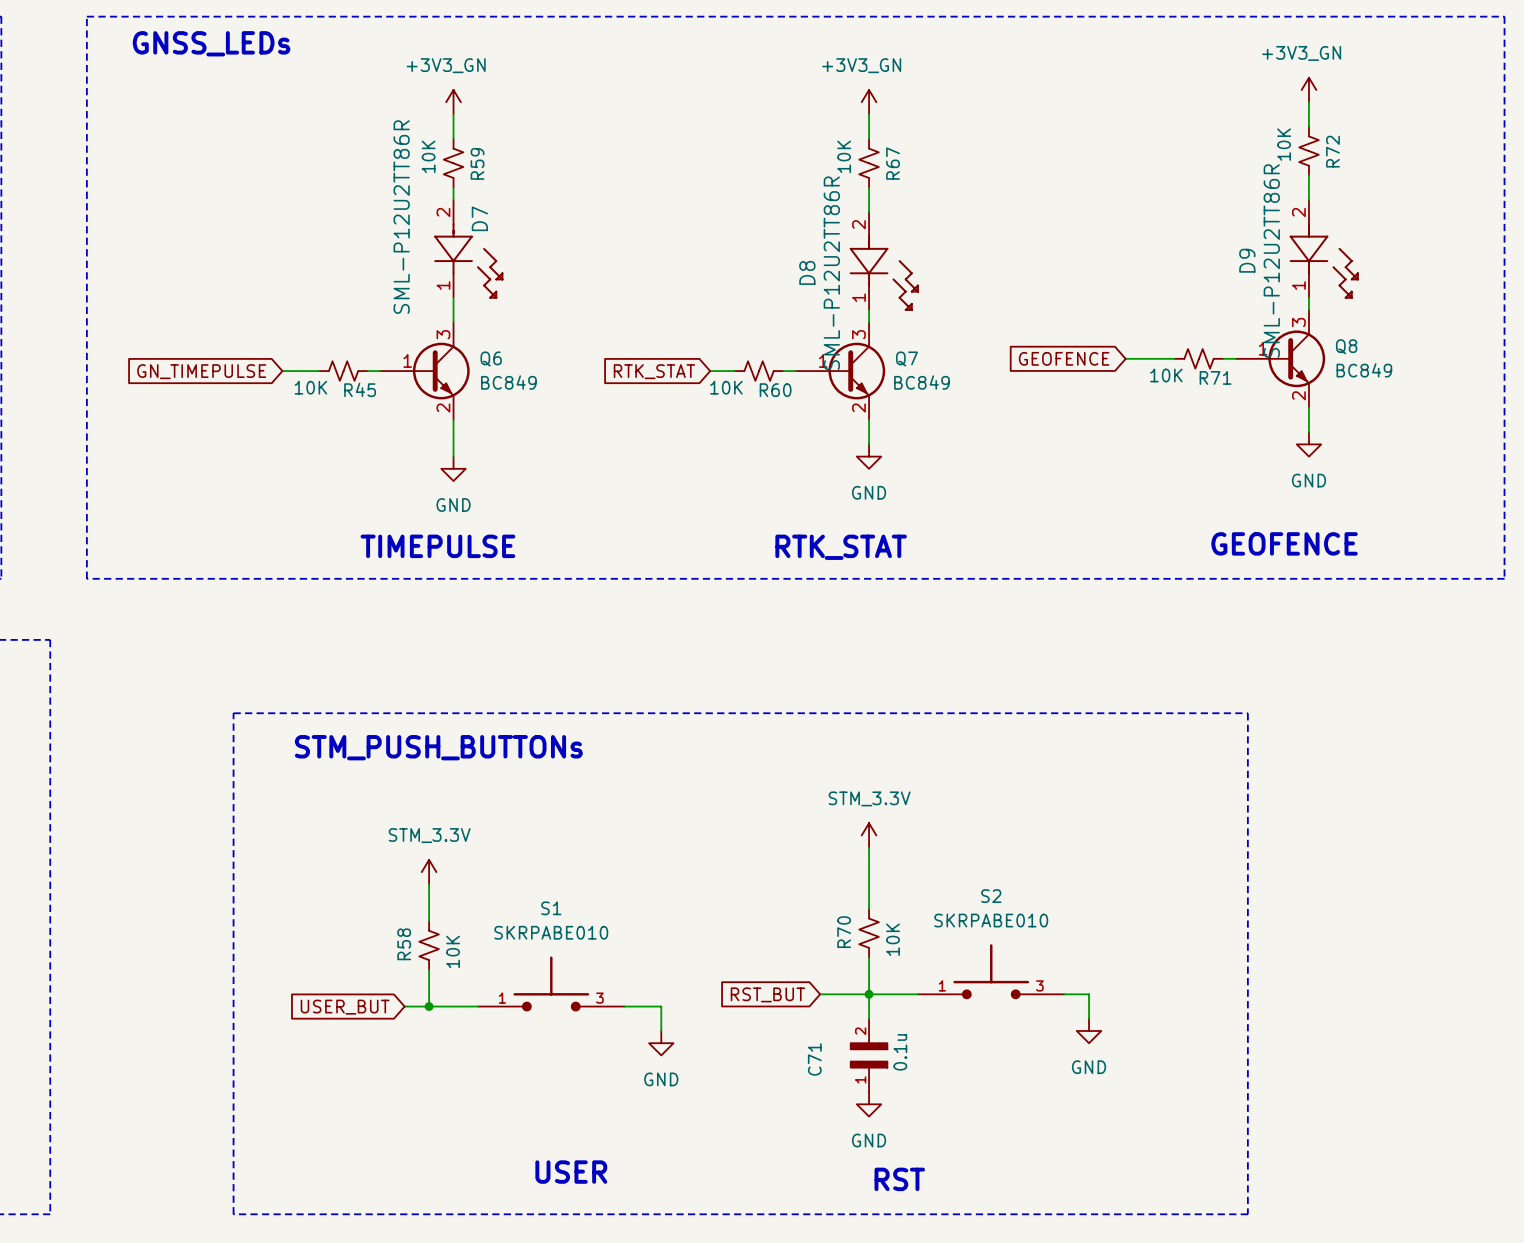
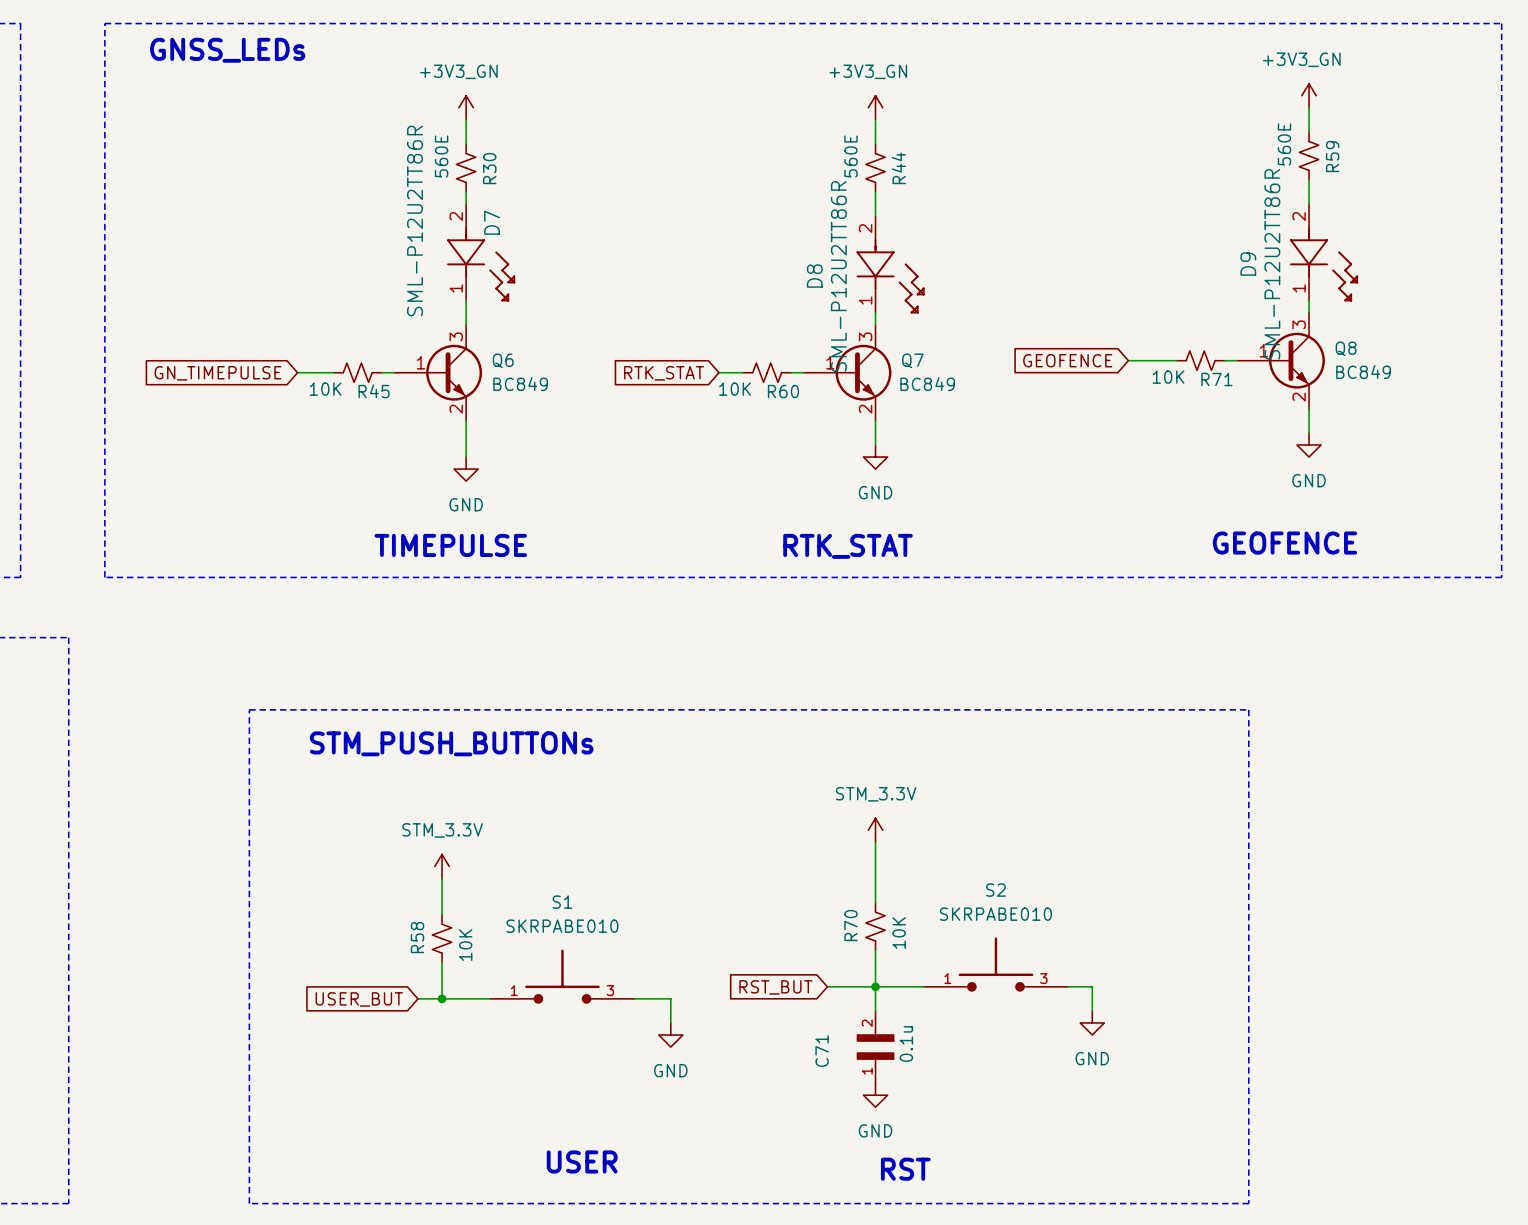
R72 value: 10K (1284, 144) -> 560E (1284, 144)
R72 name: R72 (1332, 151) -> R59 (1332, 156)
R59 value: 10K (428, 156) -> 560E (441, 156)
R67 value: 10K (844, 156) -> 560E (850, 156)
R59 name: R59 (477, 163) -> R30 (489, 168)
R67 name: R67 (893, 163) -> R44 (898, 168)

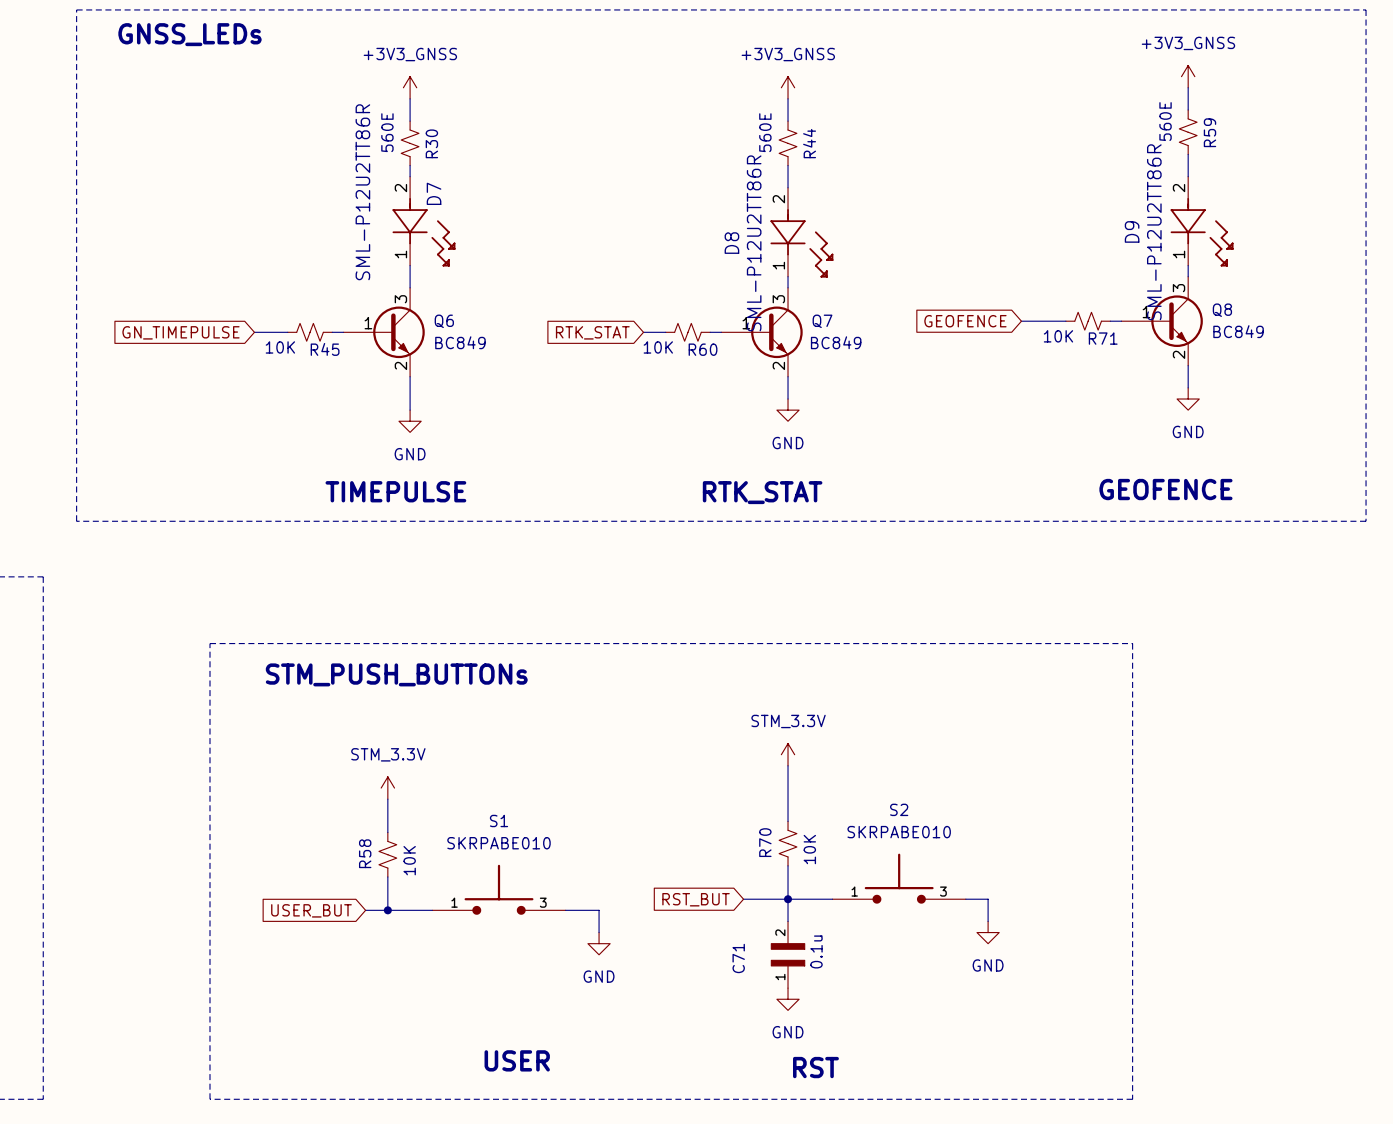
power symbol: +3V3_GN (1309, 95) -> +3V3_GNSS (1188, 76)
power symbol: +3V3_GN (466, 107) -> +3V3_GNSS (410, 87)
power symbol: +3V3_GN (875, 107) -> +3V3_GNSS (788, 87)

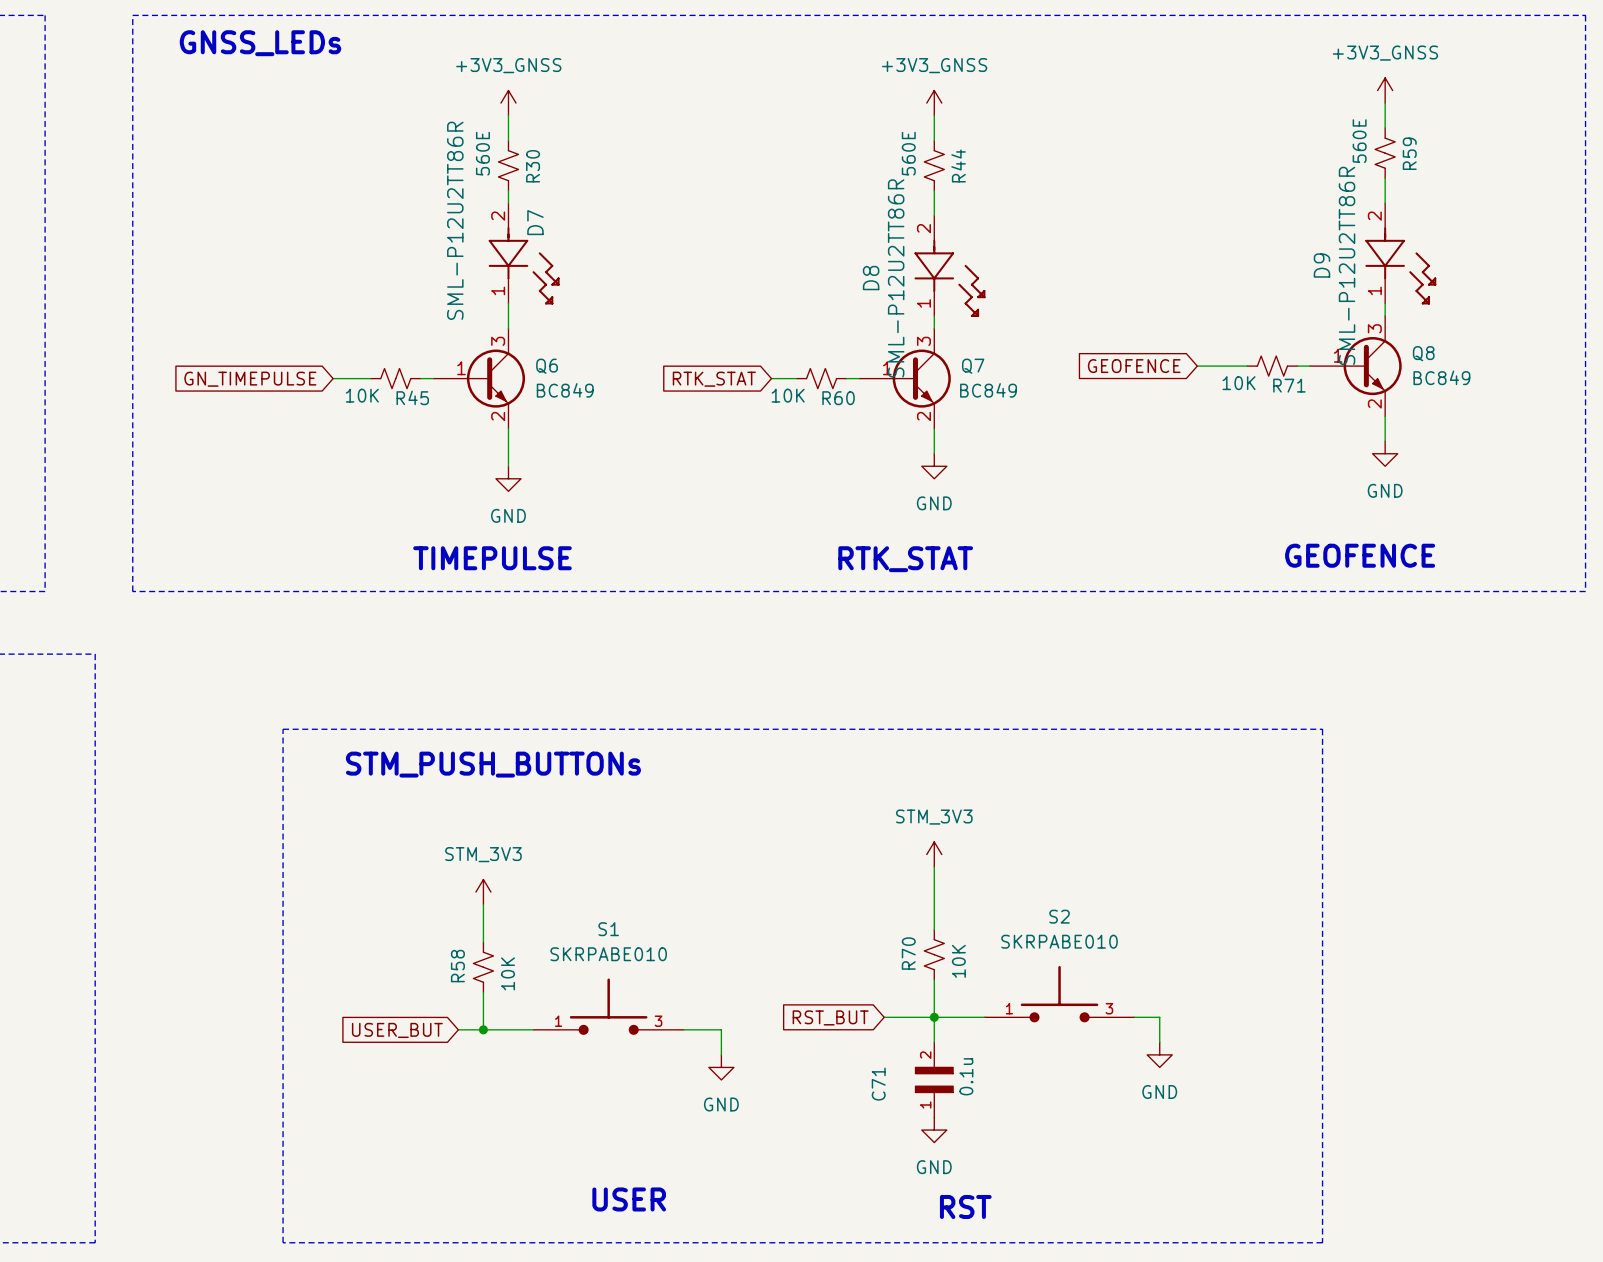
power symbol: STM_3.3V (788, 754) -> STM_3V3 (934, 854)
power symbol: STM_3.3V (387, 788) -> STM_3V3 (483, 892)

